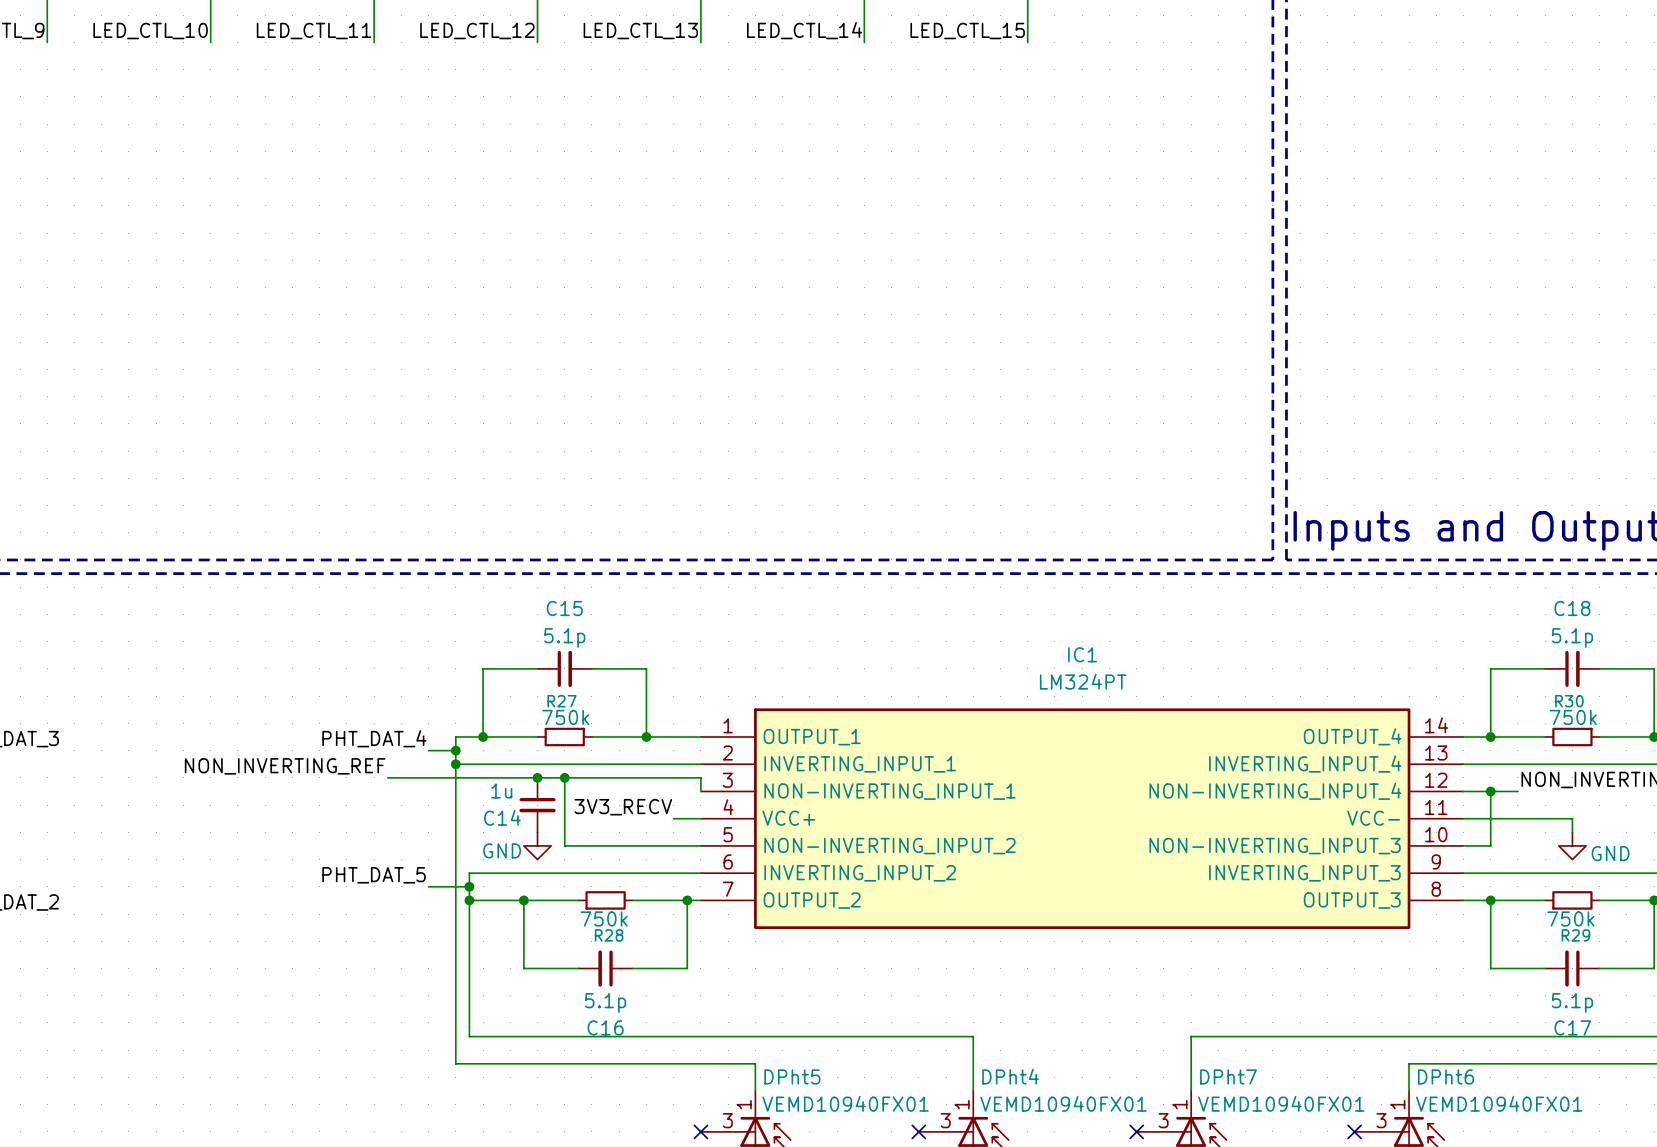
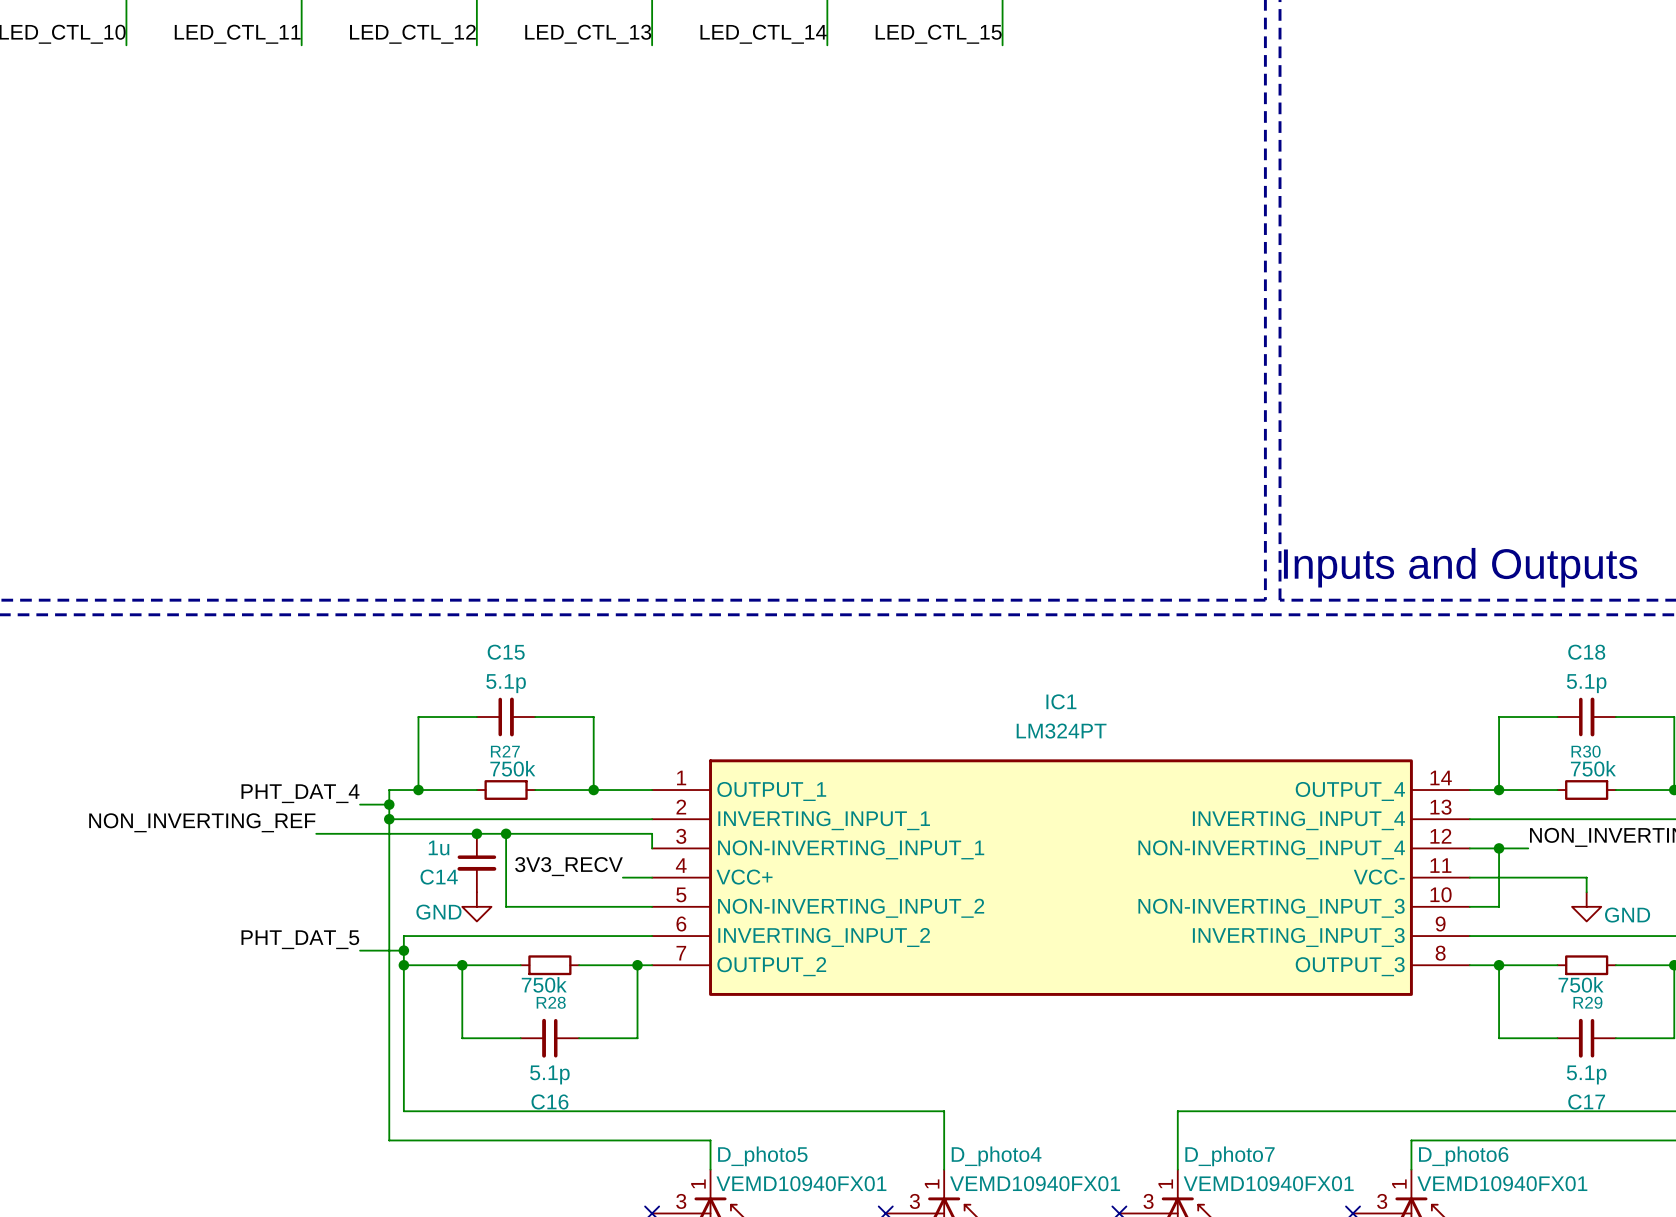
DPht5 name: DPht5 (792, 1076) -> D_photo5 (762, 1156)
DPht4 name: DPht4 (1010, 1076) -> D_photo4 (996, 1156)
DPht7 name: DPht7 (1228, 1076) -> D_photo7 (1230, 1156)
DPht6 name: DPht6 (1446, 1076) -> D_photo6 (1463, 1156)

